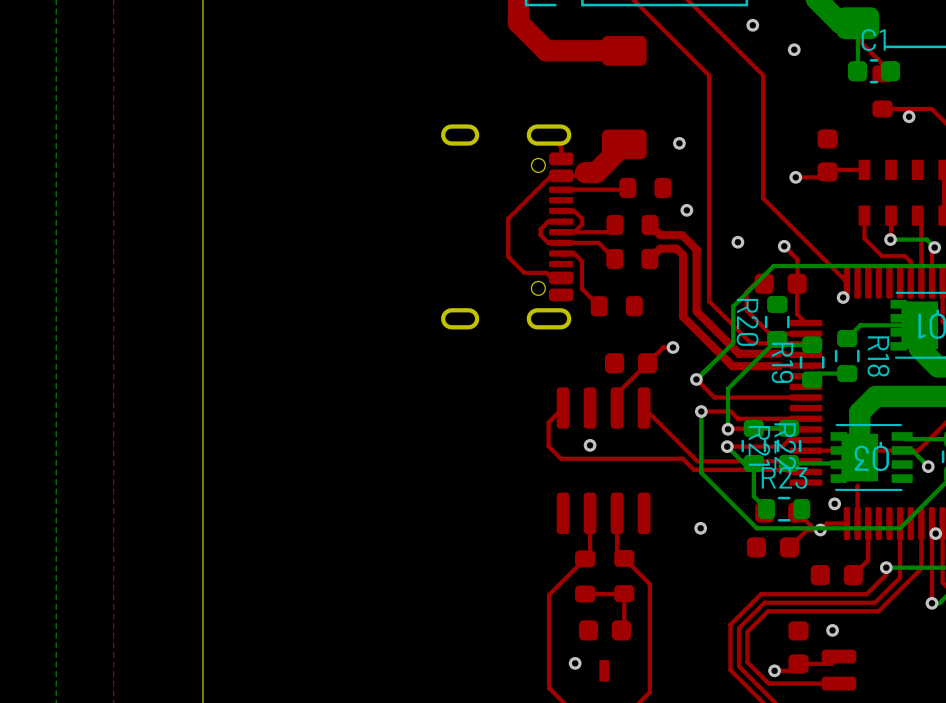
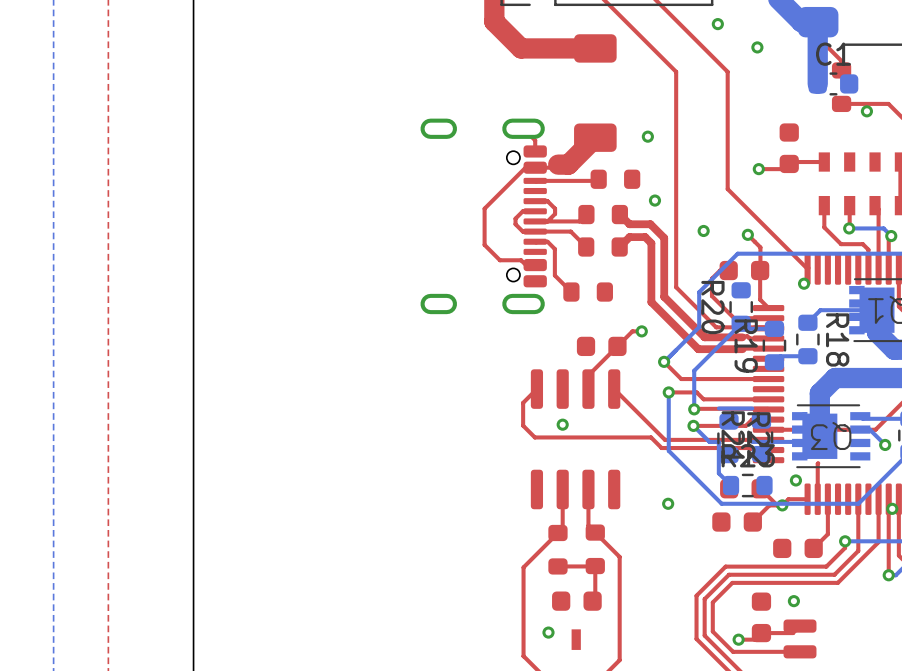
bottom track: (857, 23) (857, 71) -> (818, 22) (817, 83)
C1 position: (874, 71) -> (833, 83)
R22 position: (753, 445) -> (729, 438)
R21 position: (788, 445) -> (761, 437)

